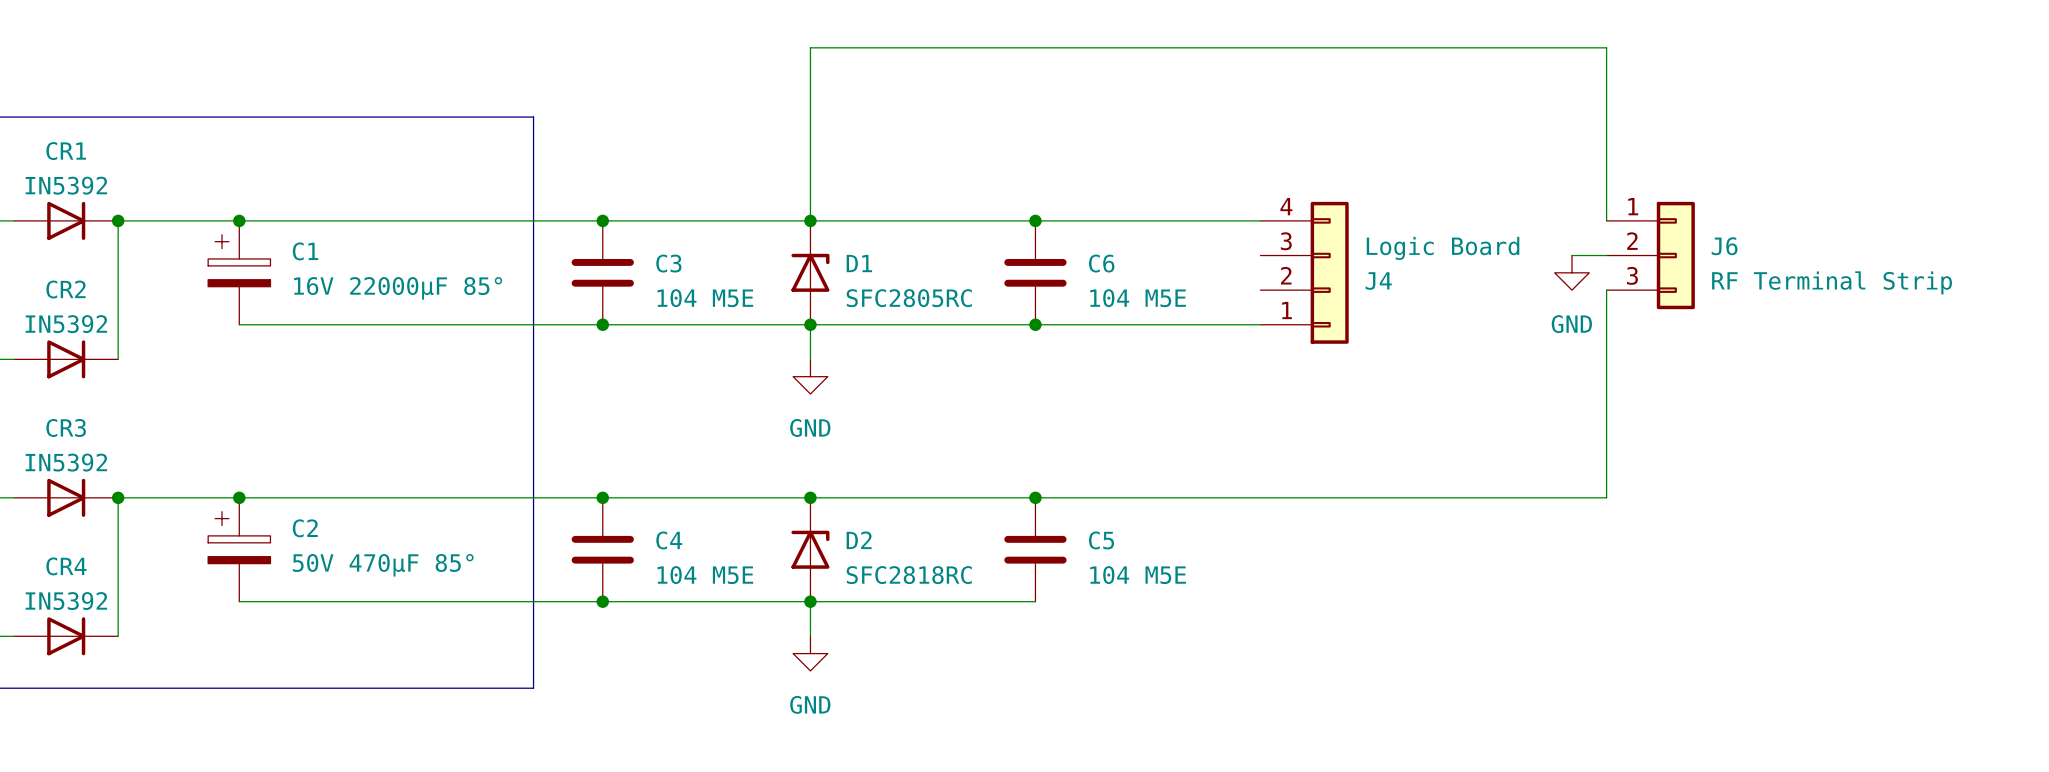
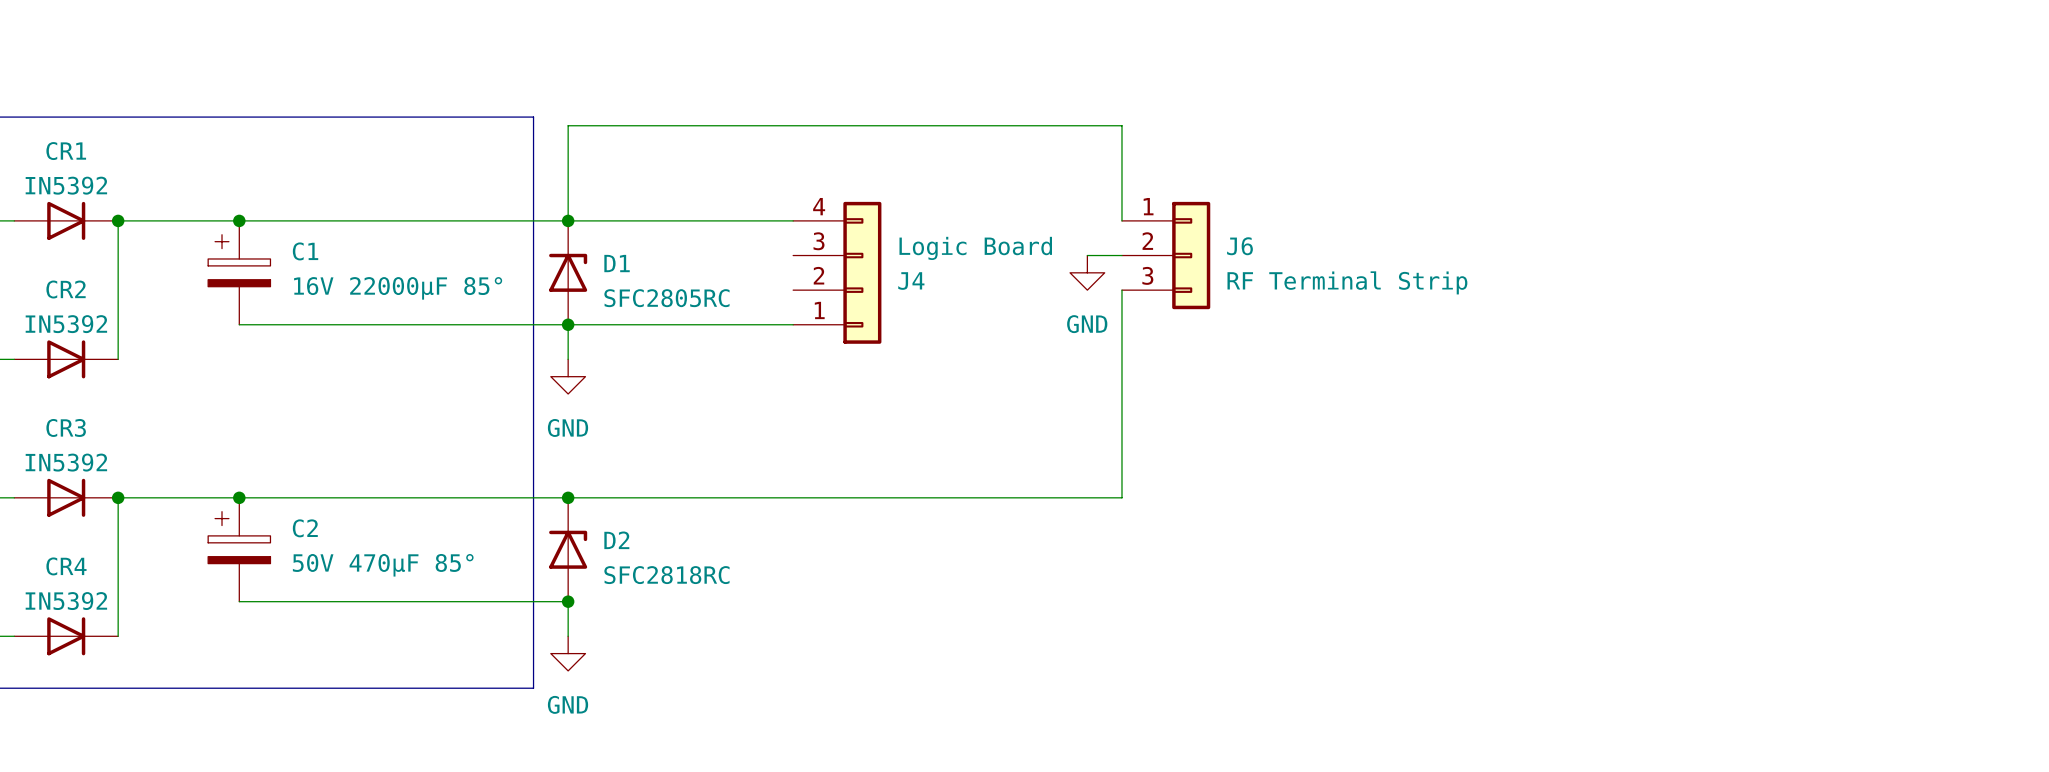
wire: none -> (568, 220) (568, 125) (1121, 125) (1121, 220)
junction position: (602, 220) -> (568, 220)
wire: (793, 220) (1260, 220) -> none
wire: (810, 220) (810, 47) (1606, 47) (1606, 220) -> none
junction: (810, 220) -> none
junction: (1035, 220) -> none
wire: none -> (1087, 255) (1121, 255)
wire: (1571, 255) (1606, 255) -> none
J6 position: (1650, 255) -> (1166, 255)
C3: 104 M5E (602, 272) -> none
D1 position: (810, 272) -> (568, 272)
C6: 104 M5E (1035, 272) -> none
power symbol: none -> GND (1087, 272)
J4 position: (1304, 272) -> (837, 272)
power symbol: GND (1571, 272) -> none
wire: (1606, 290) (1606, 497) (1121, 497) -> (1121, 290) (1121, 497)
junction position: (602, 324) -> (568, 324)
wire: (793, 324) (1260, 324) -> none
wire: (810, 324) (810, 359) -> (568, 324) (568, 359)
junction: (810, 324) -> none
junction: (1035, 324) -> none
power symbol: none -> GND (568, 376)
power symbol: GND (810, 376) -> none
junction position: (602, 497) -> (568, 497)
junction: (810, 497) -> none
junction: (1035, 497) -> none
C4: 104 M5E (602, 549) -> none
D2 position: (810, 549) -> (568, 549)
C5: 104 M5E (1035, 549) -> none
wire: (568, 601) (1035, 601) -> (568, 601) (568, 636)
junction position: (602, 601) -> (568, 601)
wire: (810, 601) (810, 636) -> none
junction: (810, 601) -> none
power symbol: none -> GND (568, 653)
power symbol: GND (810, 653) -> none

